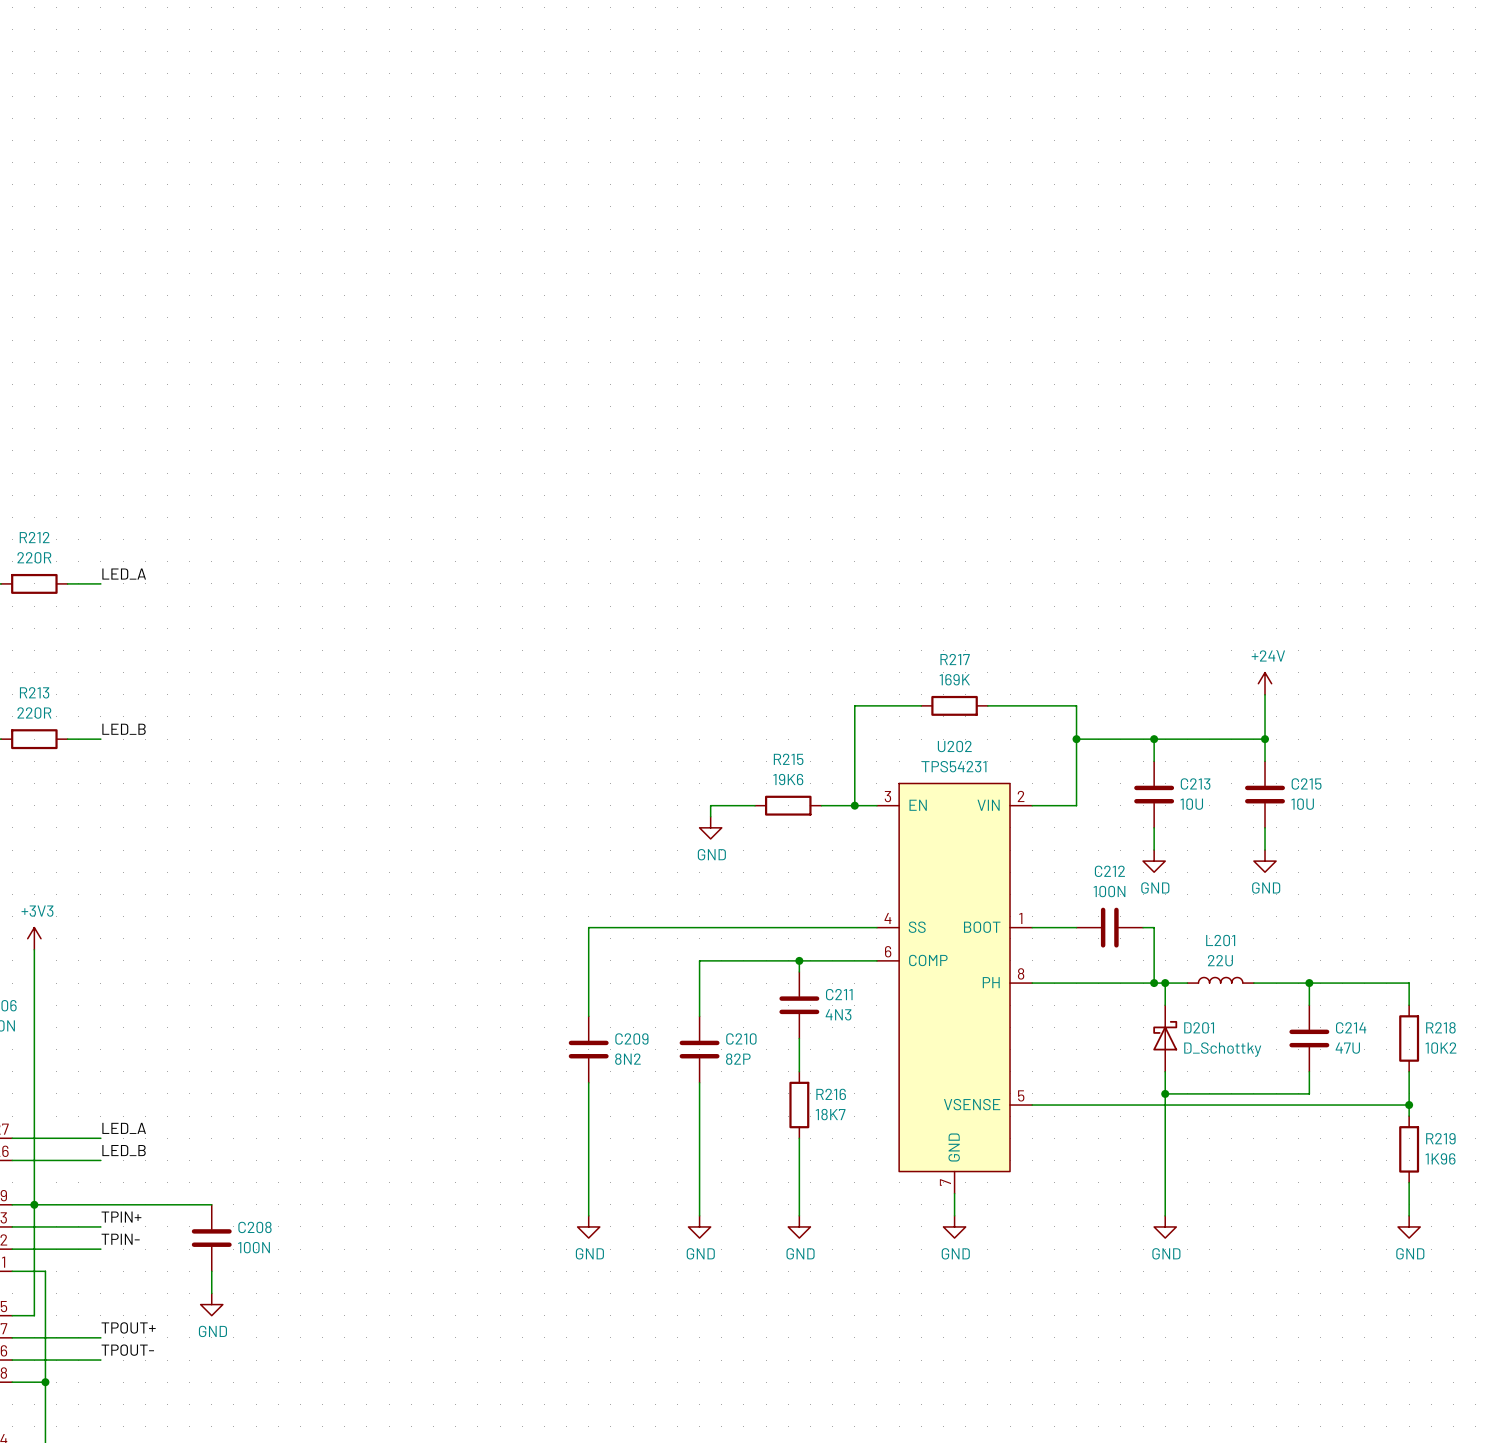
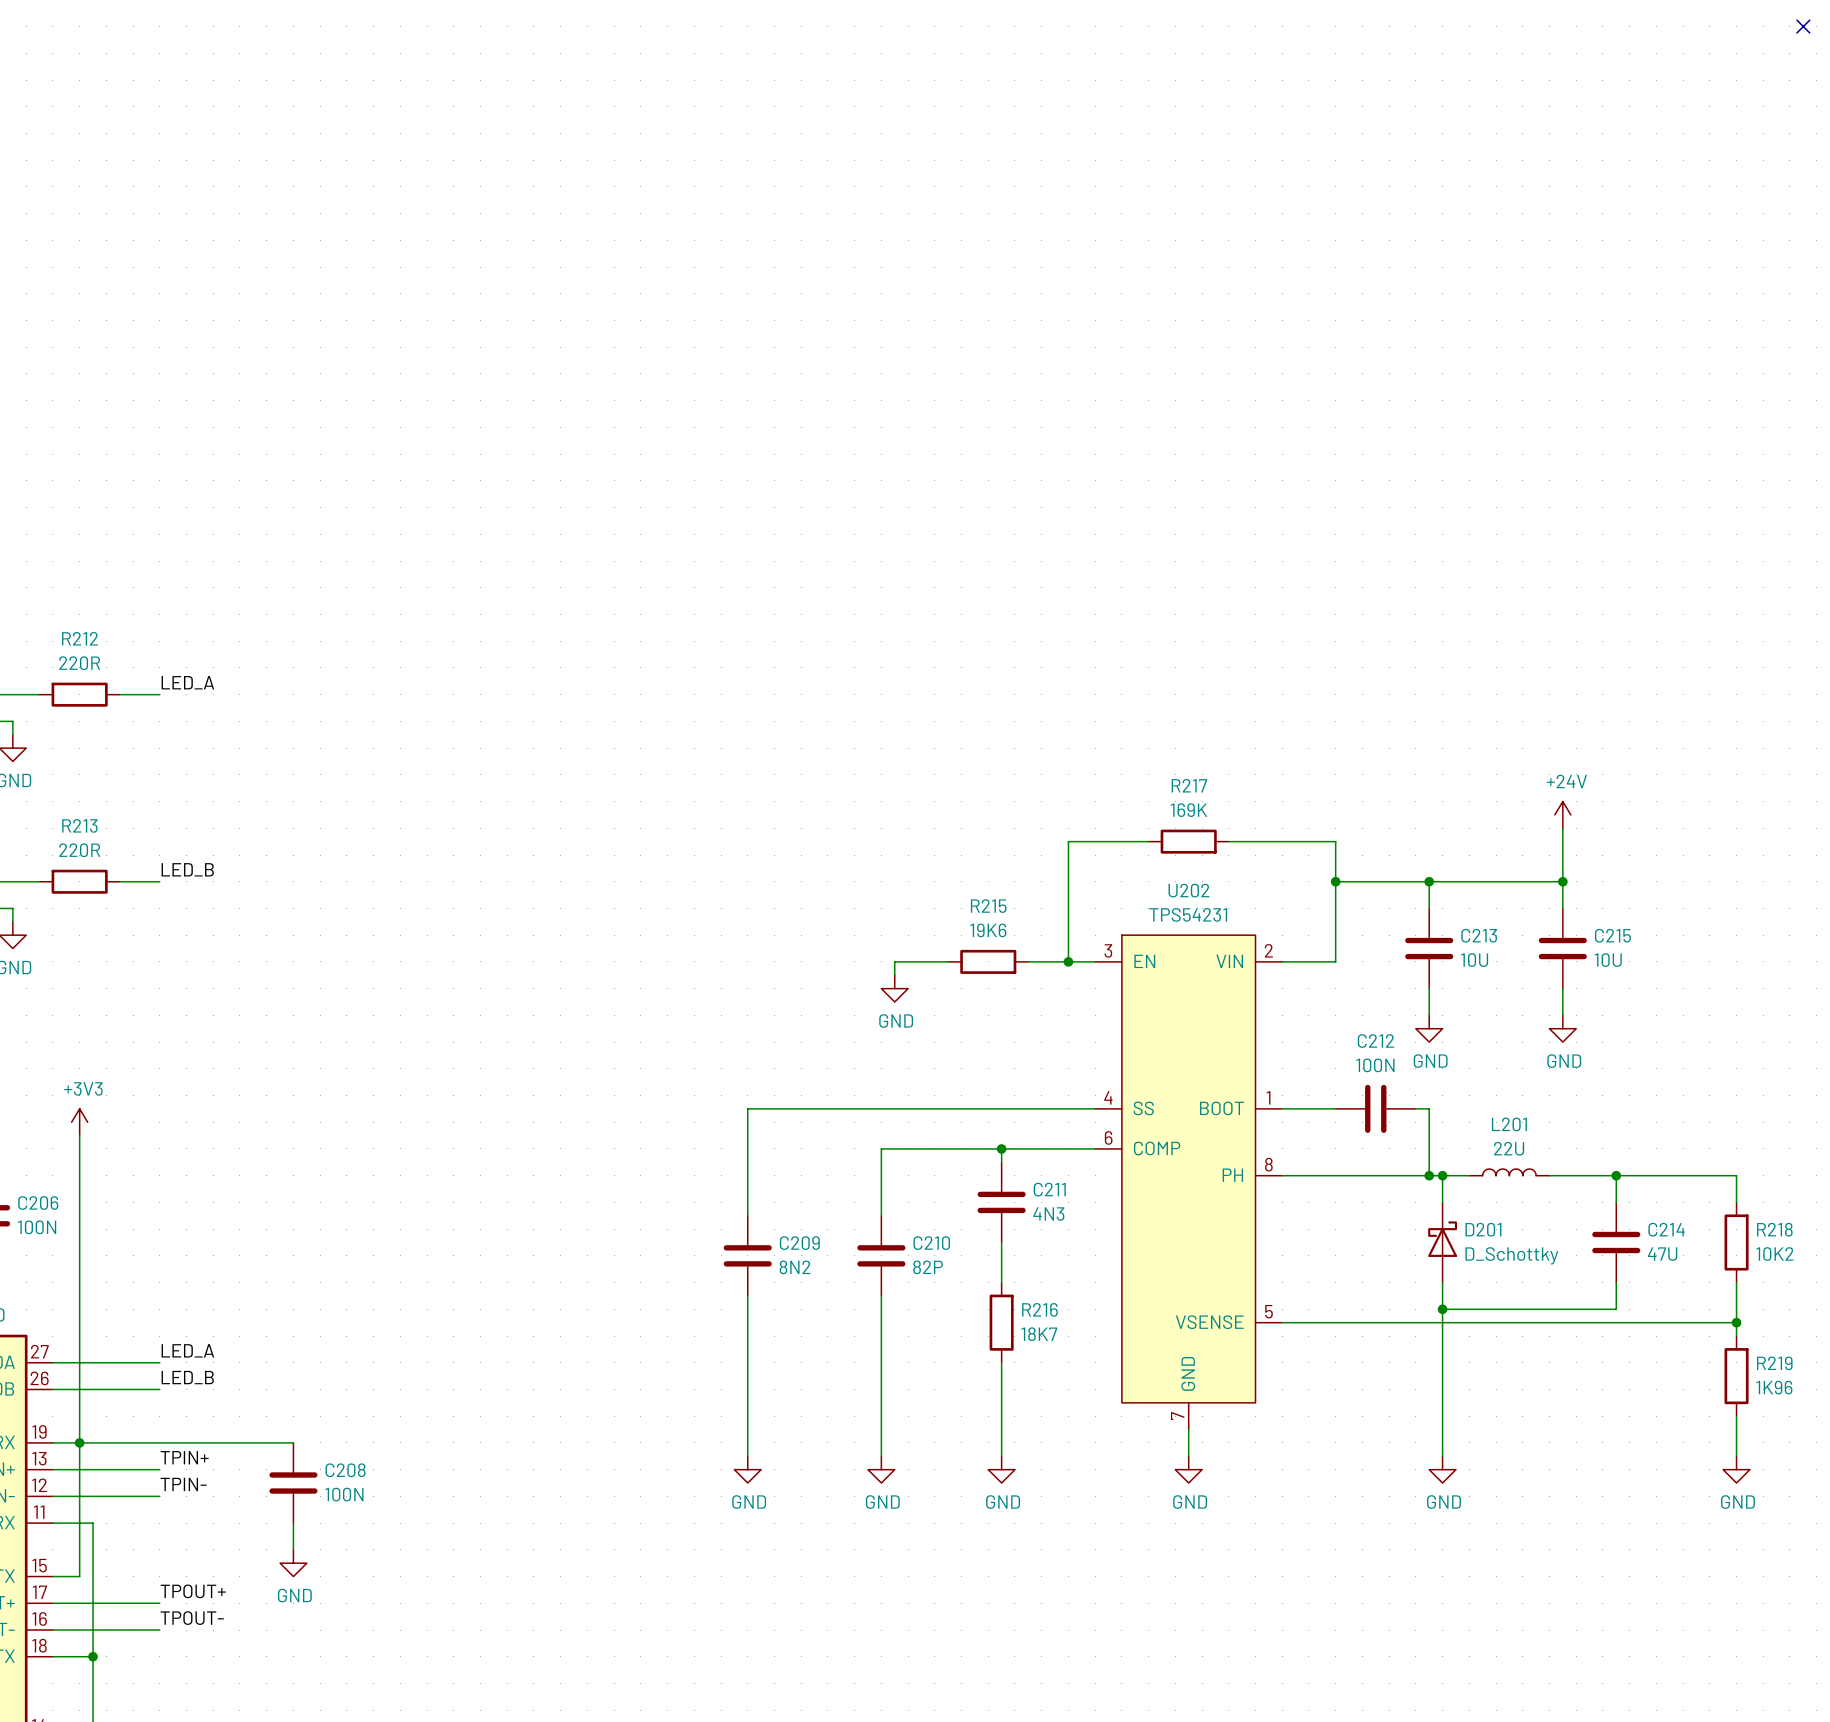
no-connect mark: none -> (1803, 26)

